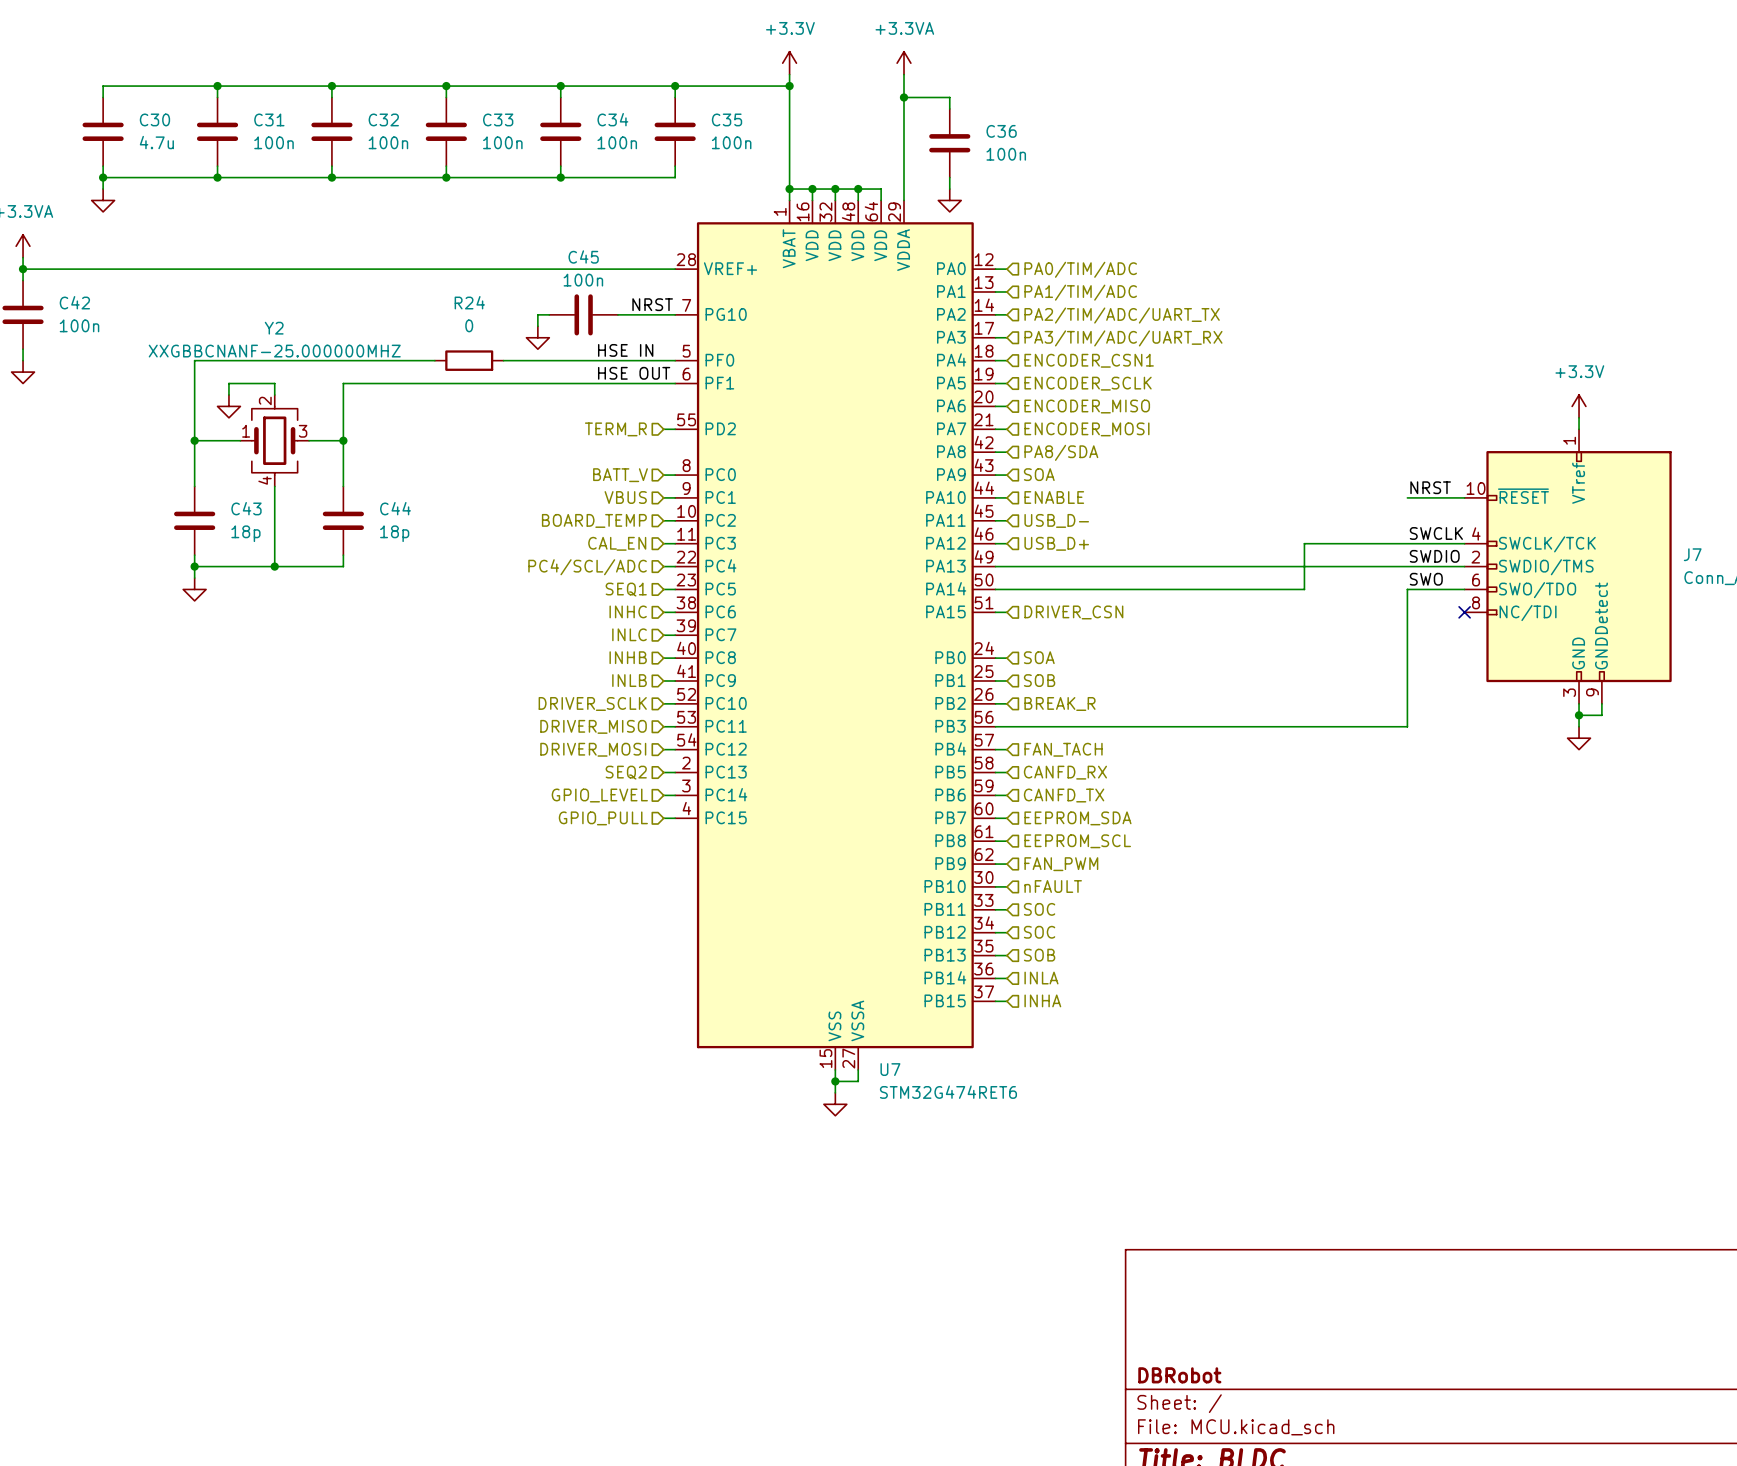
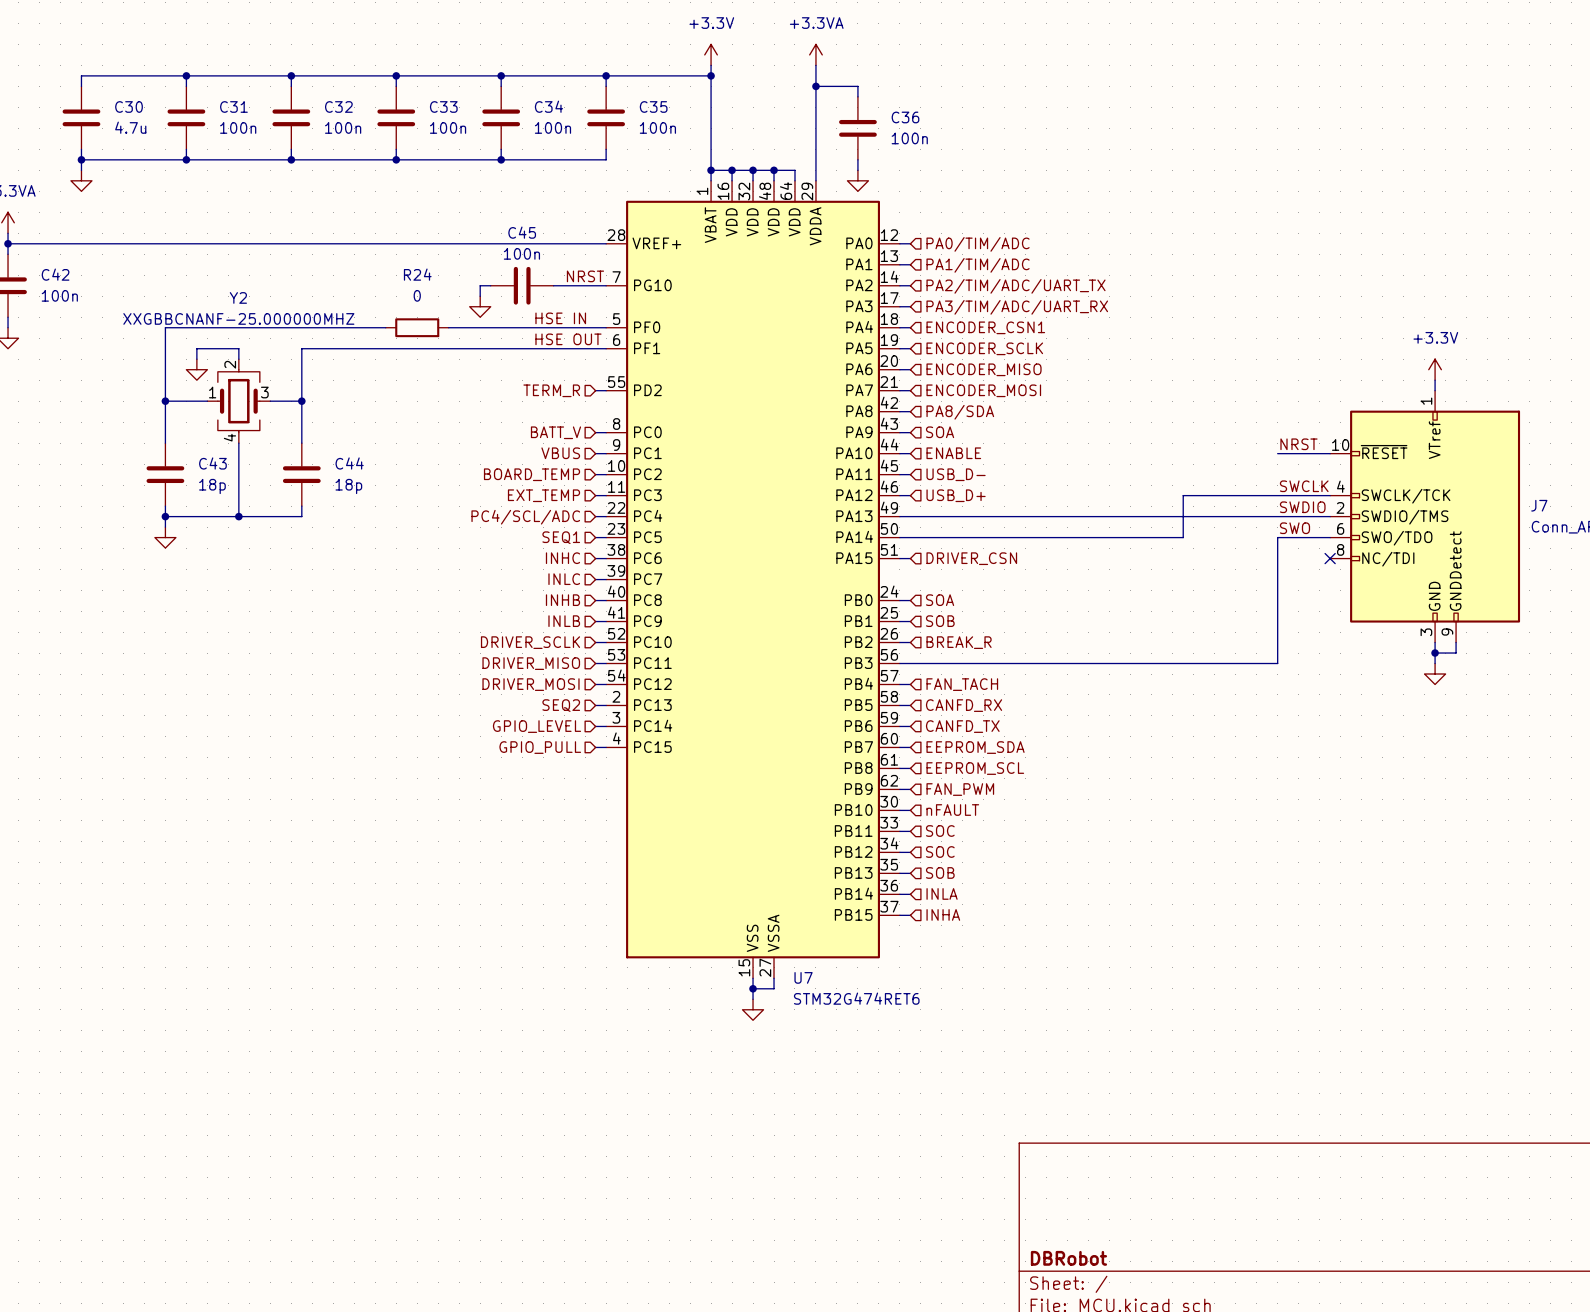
hierarchical label: CAL_EN (617, 543) -> EXT_TEMP (543, 495)

